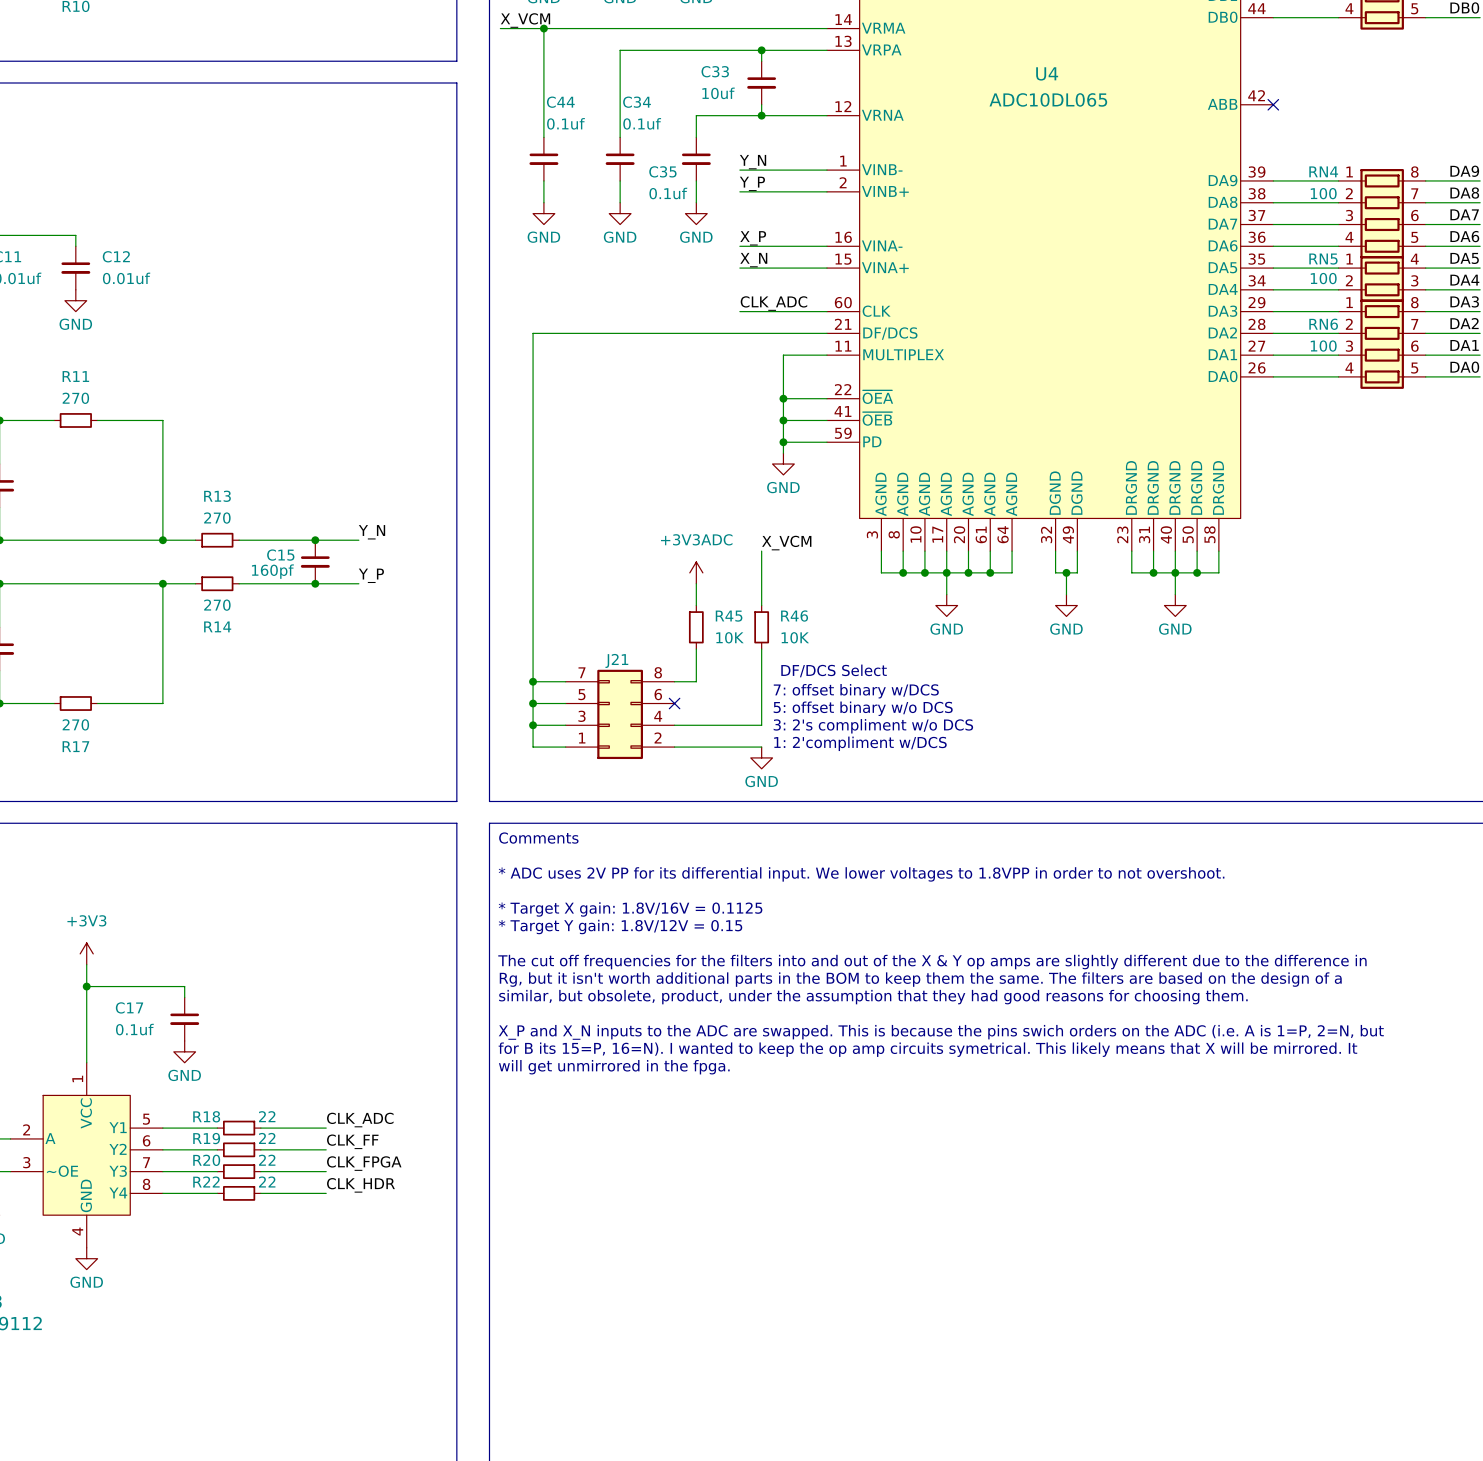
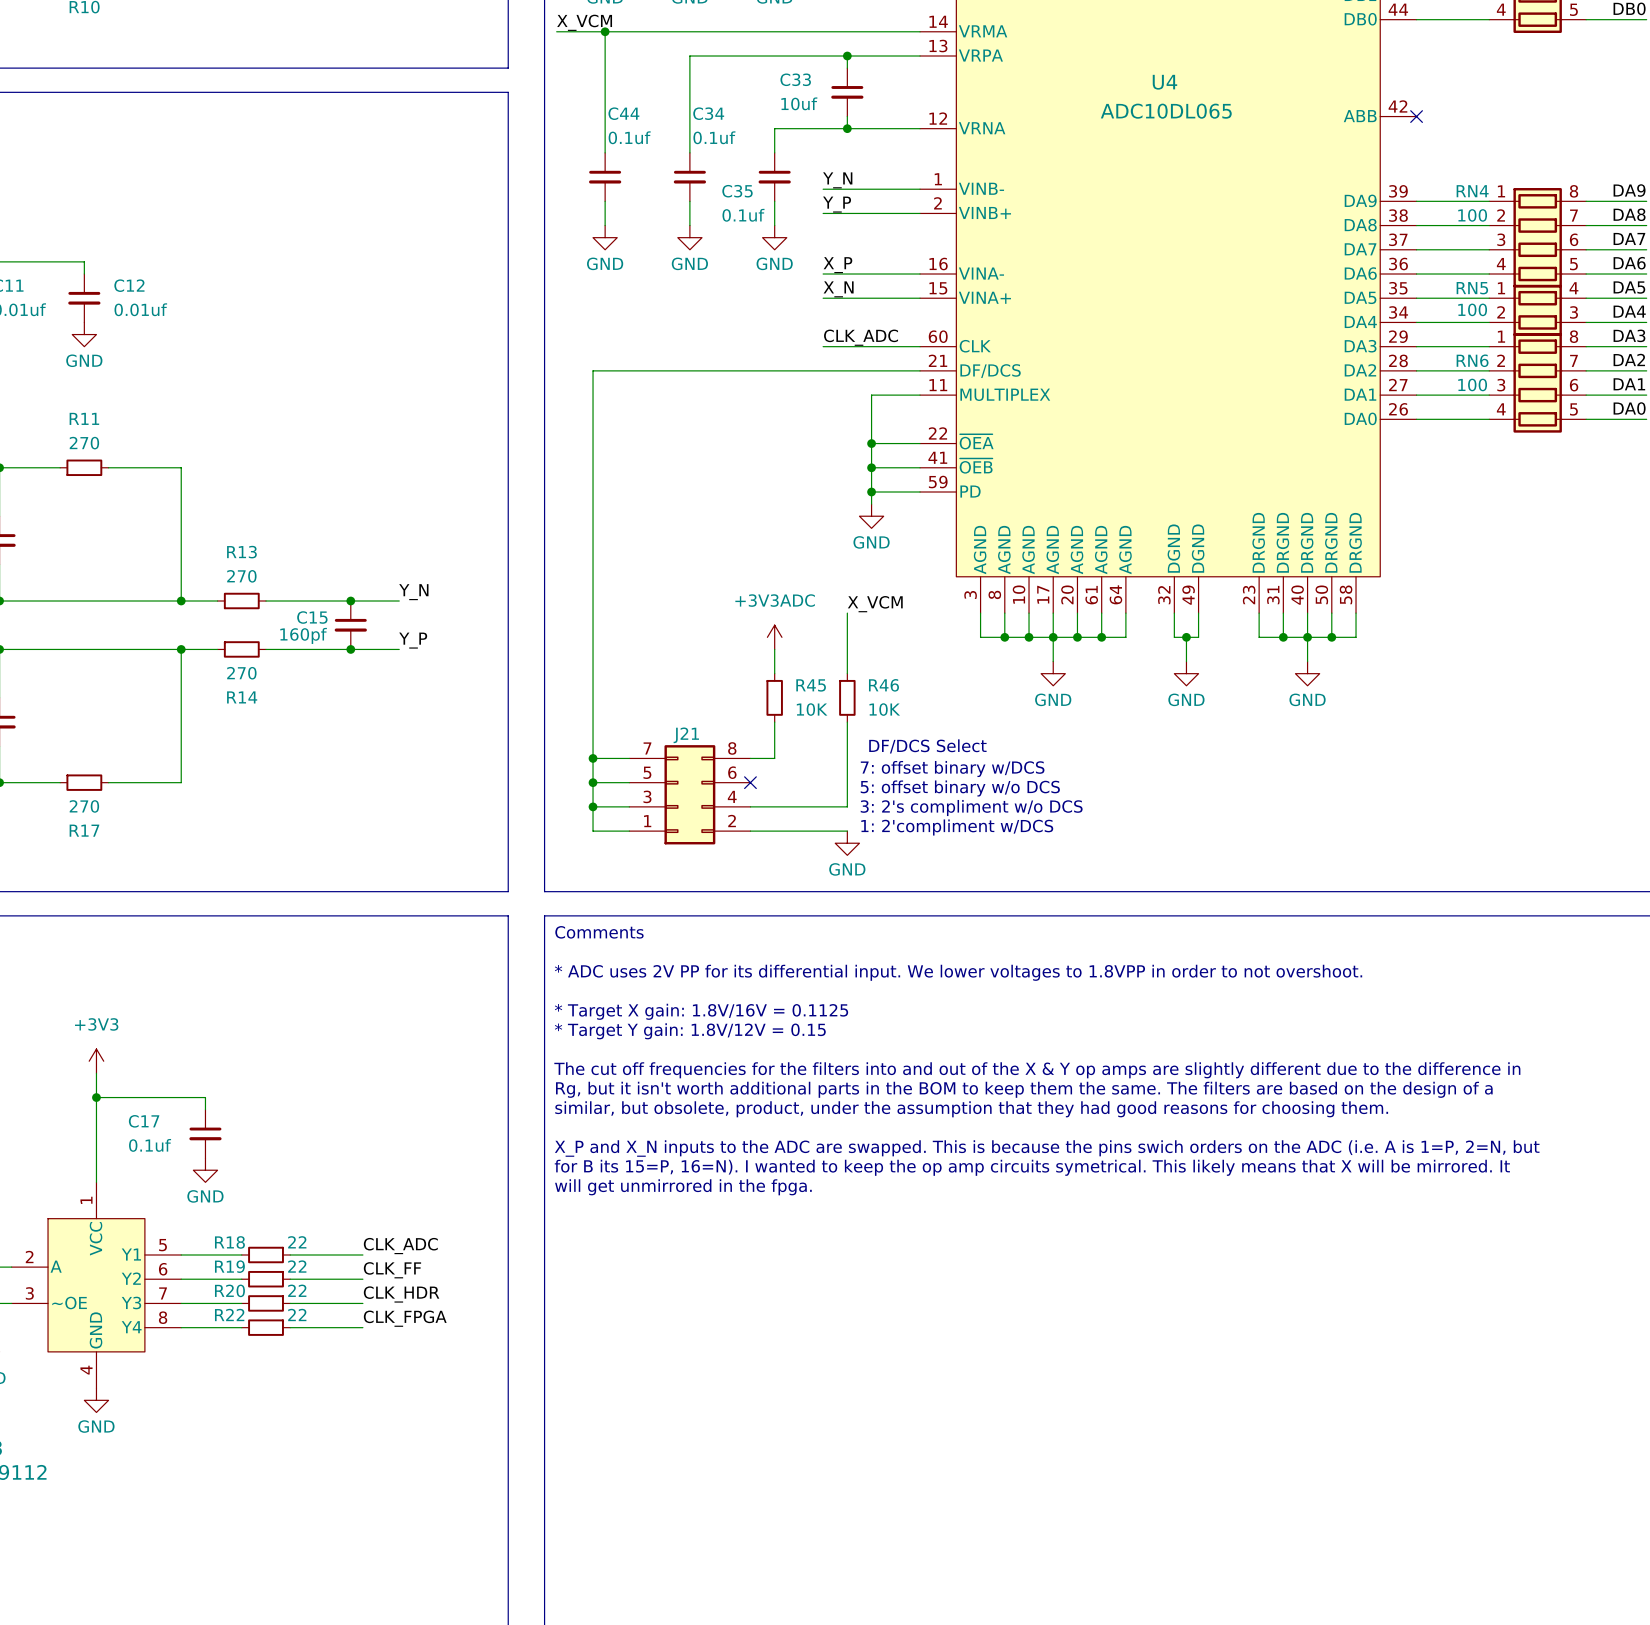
label: CLK_FPGA (364, 1163) -> CLK_HDR (401, 1294)
label: CLK_HDR (360, 1185) -> CLK_FPGA (405, 1318)

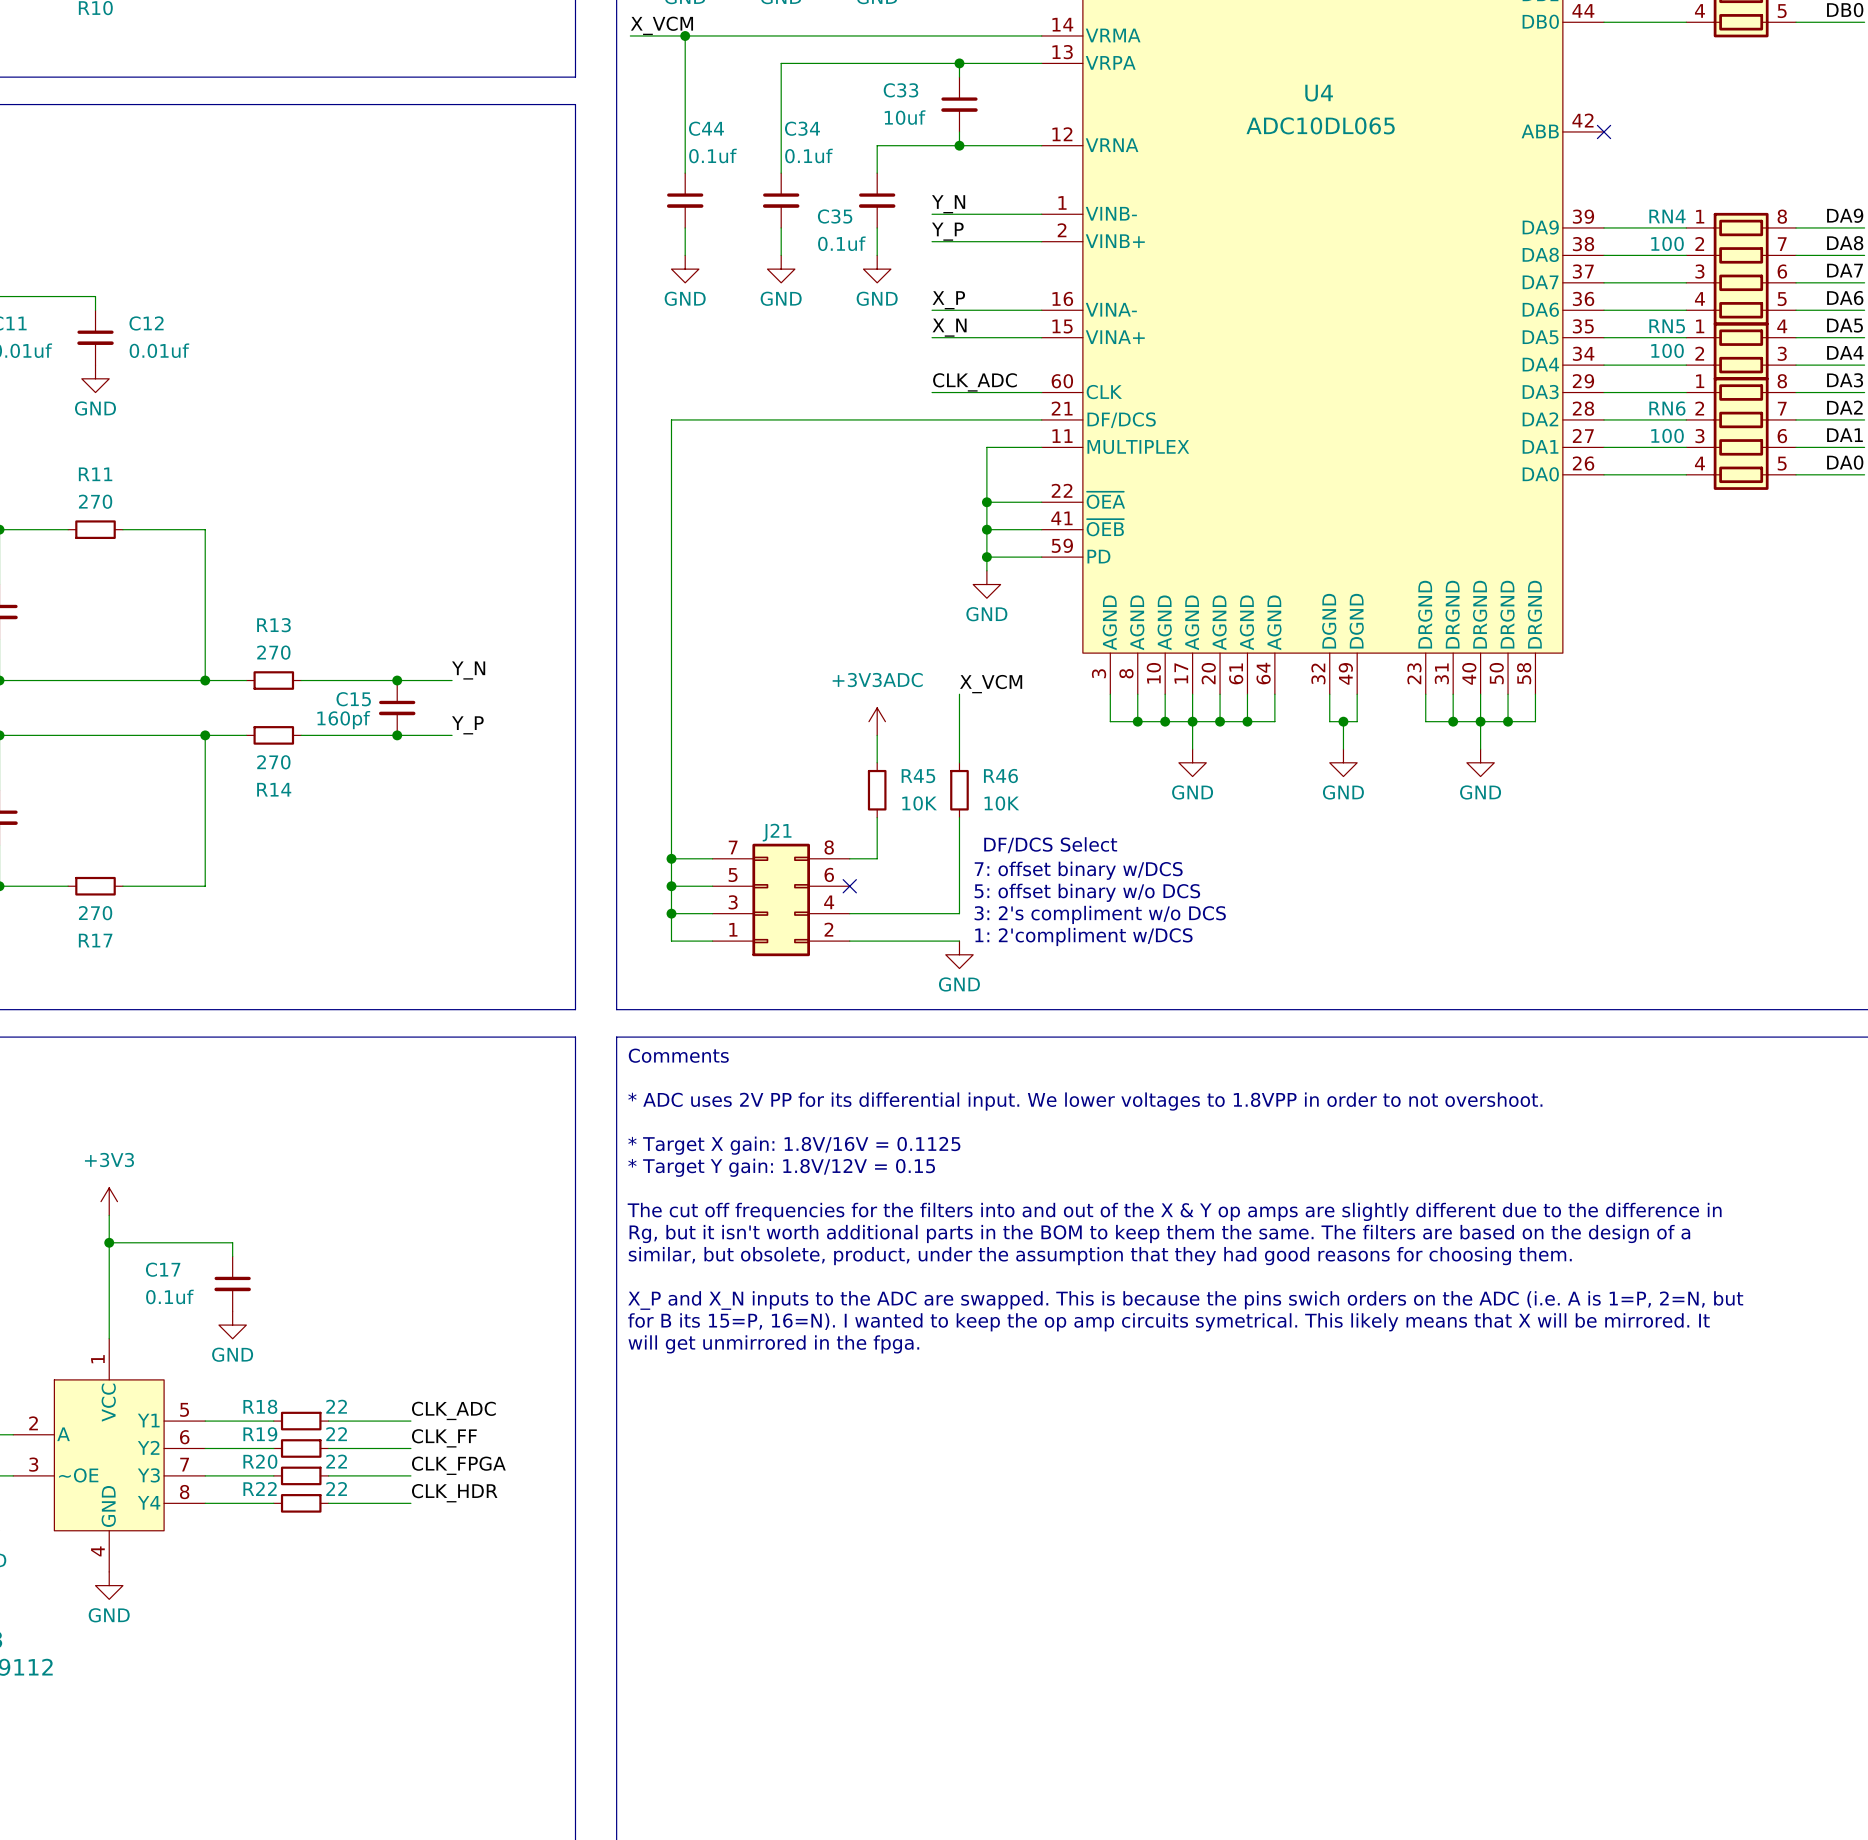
label: CLK_HDR (401, 1294) -> CLK_FPGA (458, 1465)
label: CLK_FPGA (405, 1318) -> CLK_HDR (454, 1493)

